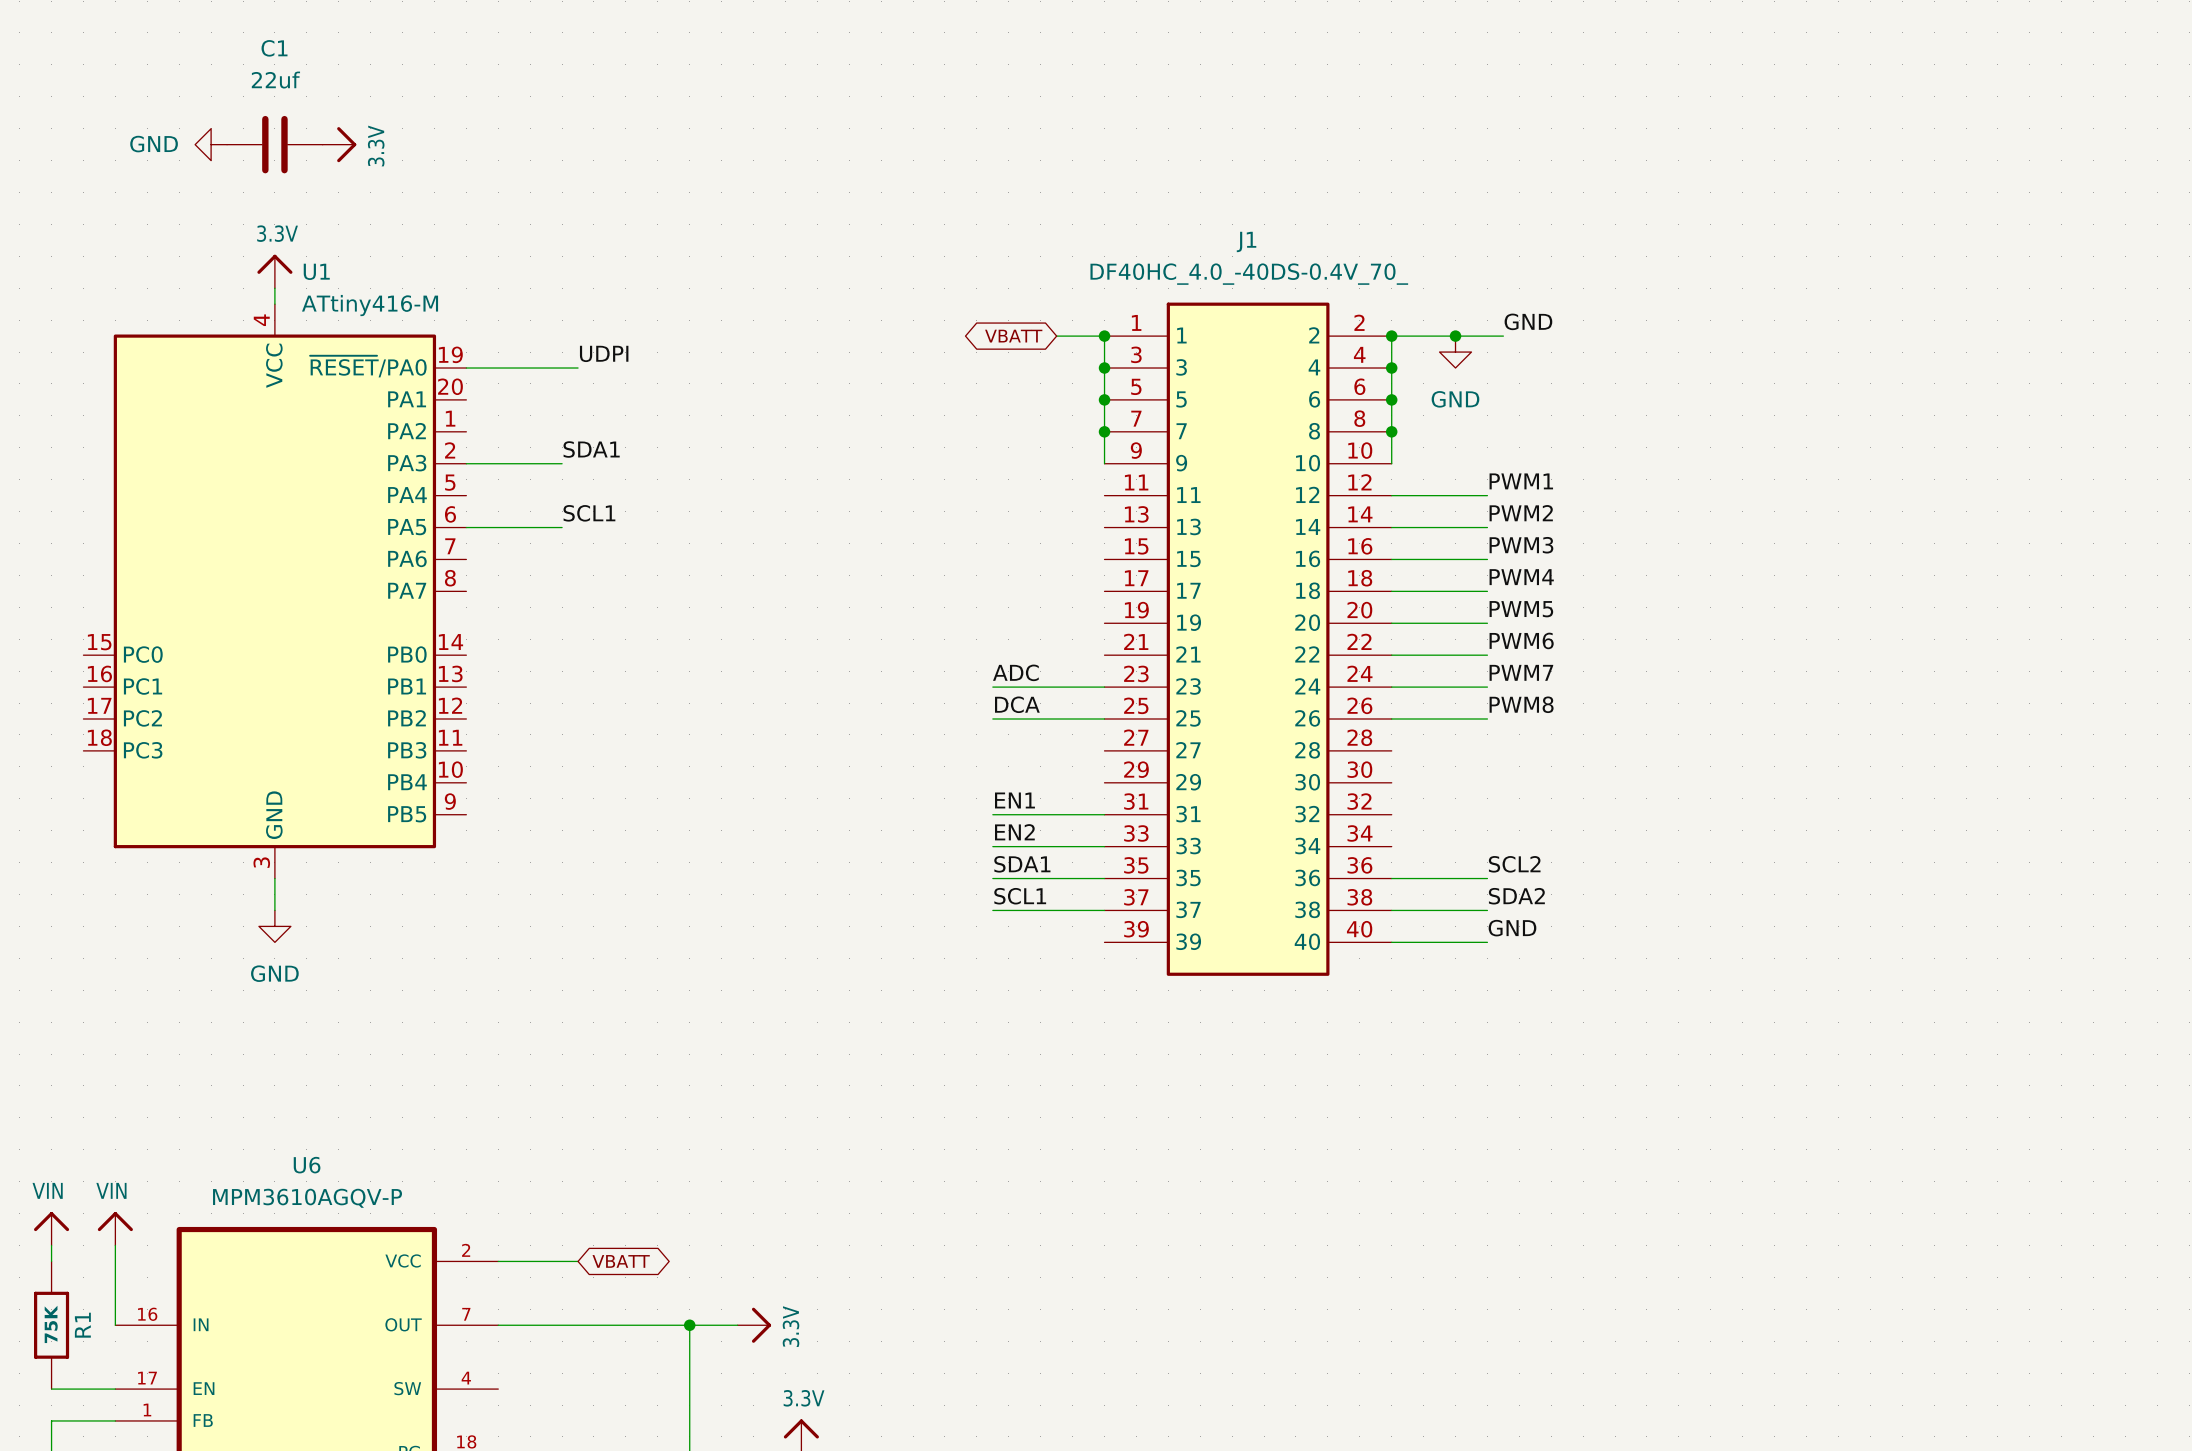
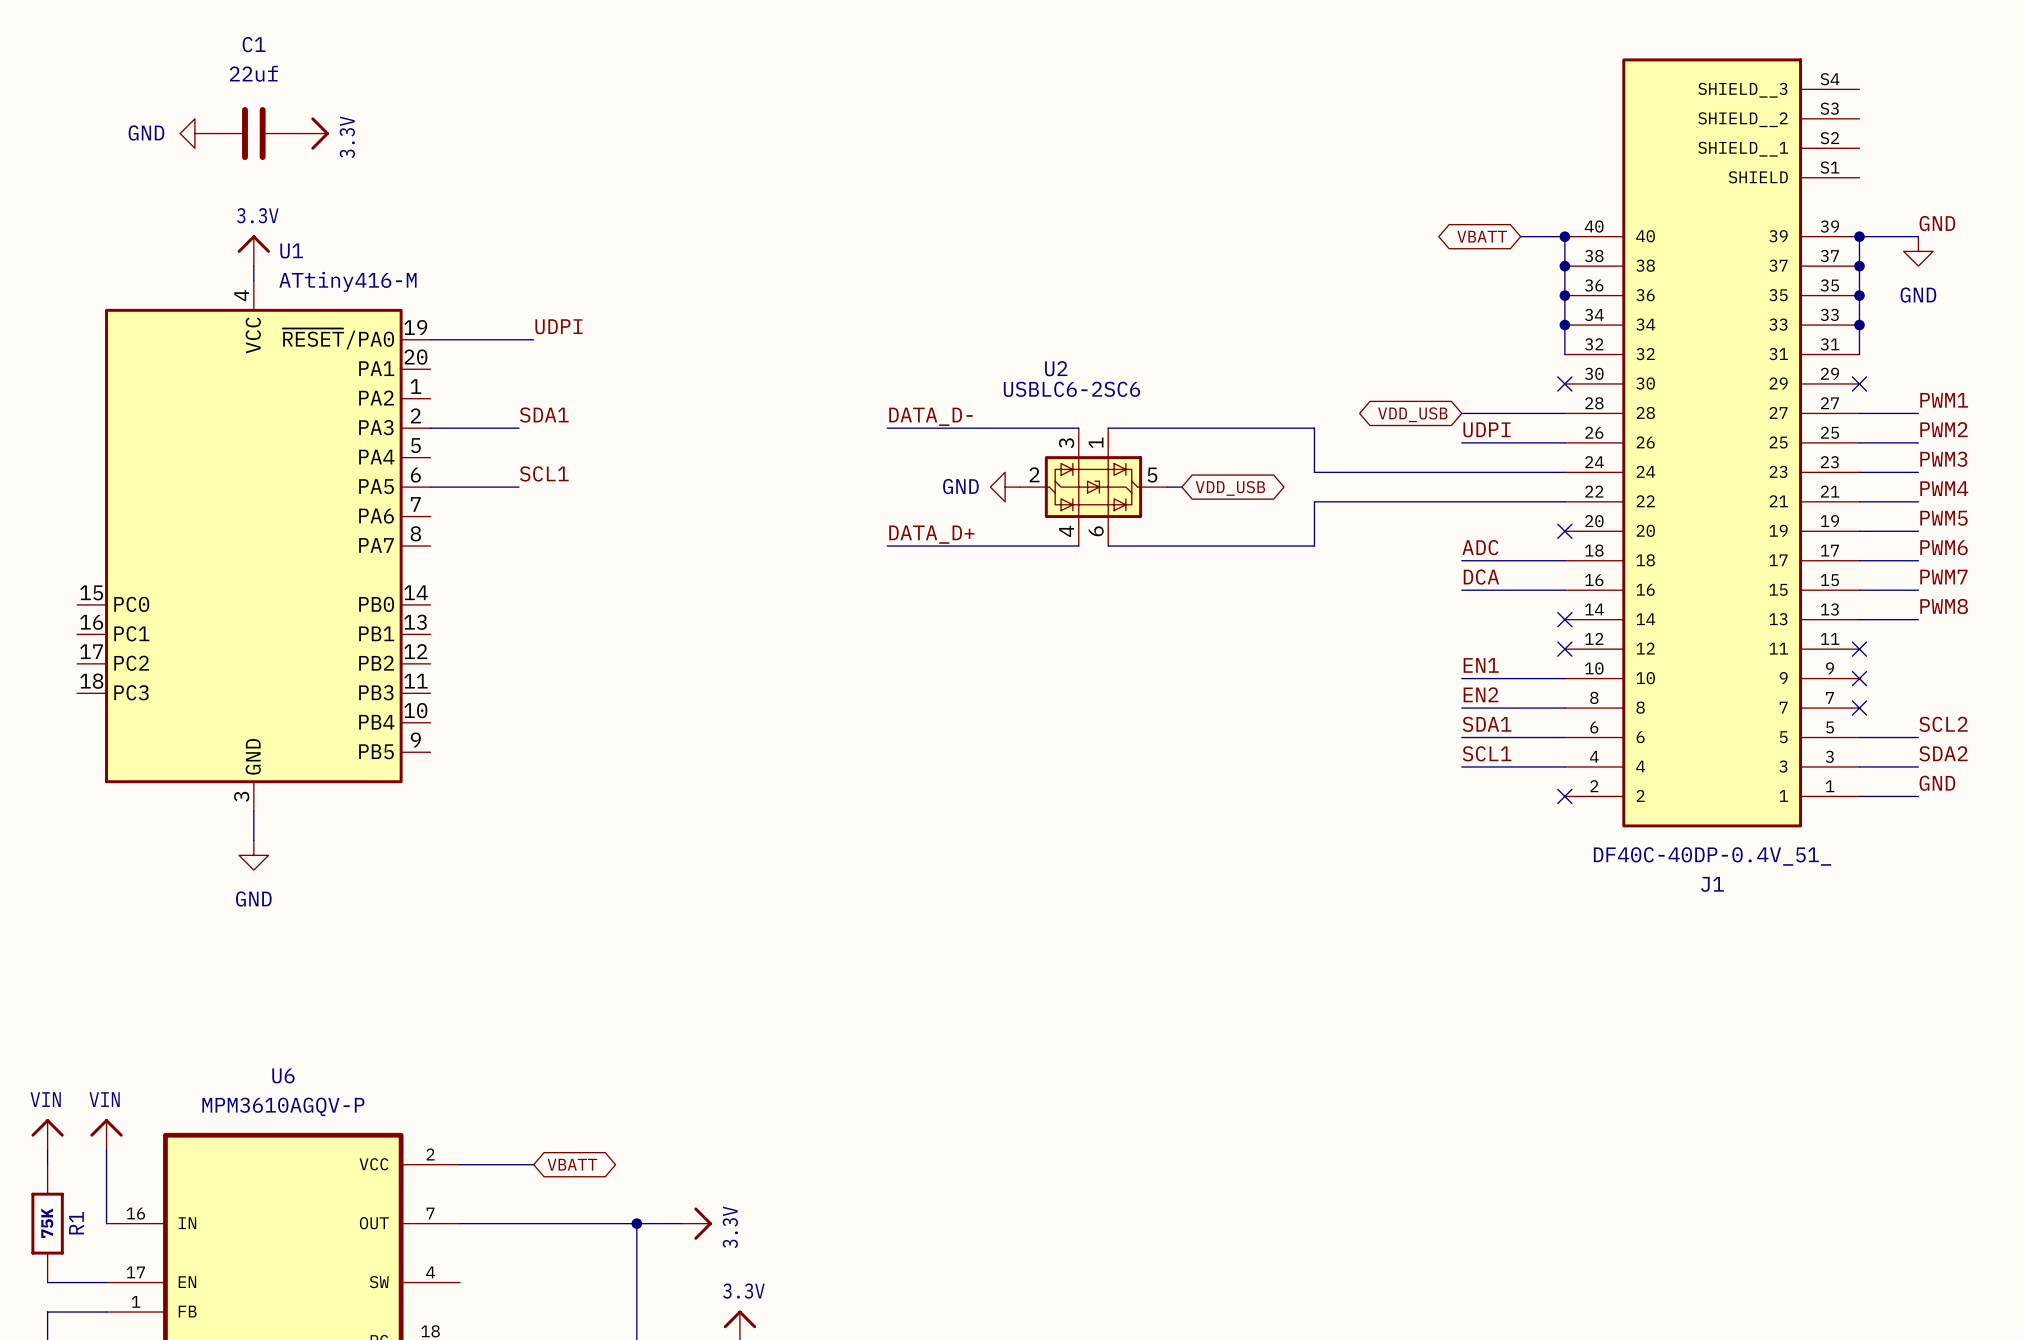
J1 name position: J1 (1246, 241) -> J1 (1712, 884)
label: none -> GND (1937, 223)
global label: none -> VBATT (1482, 236)
wire: none -> (1520, 236) (1564, 236) (1564, 354)
junction: none -> (1564, 236)
junction: none -> (1859, 236)
wire: none -> (1918, 236) (1859, 236) (1859, 354)
power symbol: none -> GND (1918, 251)
J1 value: DF40HC_4.0_-40DS-0.4V_70_ (1249, 274) -> DF40C-40DP-0.4V_51_ (1712, 856)
junction: none -> (1564, 266)
junction: none -> (1859, 266)
J1 symbol: [1104, 302, 1392, 976] -> [1564, 58, 1860, 828]
junction: none -> (1564, 295)
junction: none -> (1859, 295)
label: GND (1528, 321) -> none
global label: VBATT (1013, 336) -> none
wire: (1056, 336) (1104, 336) (1104, 463) -> none
junction: (1104, 336) -> none
junction: (1391, 336) -> none
junction: (1455, 336) -> none
wire: (1503, 336) (1391, 336) (1391, 463) -> none
power symbol: GND (1455, 352) -> none
junction: none -> (1564, 325)
junction: none -> (1859, 325)
junction: (1104, 368) -> none
junction: (1391, 368) -> none
junction: (1104, 399) -> none
junction: (1391, 399) -> none
no-connect mark: none -> (1564, 383)
no-connect mark: none -> (1859, 383)
junction: (1104, 431) -> none
junction: (1391, 431) -> none
label: none -> PWM1 (1944, 400)
wire: none -> (1461, 413) (1564, 413)
wire: none -> (1859, 413) (1918, 413)
global label: none -> VDD_USB (1412, 414)
label: none -> DATA_D- (930, 416)
wire: none -> (887, 428) (1078, 428)
wire: none -> (1108, 428) (1314, 428) (1314, 472) (1564, 472)
label: none -> UDPI (1487, 429)
label: none -> PWM2 (1944, 429)
wire: none -> (1461, 442) (1564, 442)
wire: none -> (1859, 442) (1918, 442)
label: PWM1 (1521, 481) -> none
wire: (1391, 495) (1487, 495) -> none
label: none -> PWM3 (1943, 459)
wire: none -> (1859, 472) (1918, 472)
label: PWM2 (1521, 513) -> none
power symbol: none -> GND (1005, 487)
U2: none -> USBLC6-2SC6 (1093, 487)
wire: (1391, 527) (1487, 527) -> none
global label: none -> VDD_USB (1230, 488)
label: none -> PWM4 (1944, 488)
wire: none -> (1859, 501) (1918, 501)
label: PWM3 (1521, 545) -> none
wire: (1391, 559) (1487, 559) -> none
label: none -> PWM5 (1943, 518)
no-connect mark: none -> (1564, 531)
wire: none -> (1859, 531) (1918, 531)
label: PWM4 (1521, 577) -> none
label: none -> DATA_D+ (931, 534)
wire: none -> (887, 546) (1078, 546)
wire: (1423, 591) (1487, 591) -> (1314, 546) (1314, 501) (1564, 501)
label: none -> ADC (1480, 547)
label: none -> PWM6 (1944, 547)
wire: none -> (1461, 560) (1564, 560)
wire: none -> (1859, 560) (1918, 560)
label: PWM5 (1521, 609) -> none
wire: (1391, 623) (1487, 623) -> none
label: none -> PWM7 (1943, 577)
label: none -> DCA (1481, 577)
wire: none -> (1461, 590) (1564, 590)
wire: none -> (1859, 590) (1918, 590)
label: PWM6 (1521, 640) -> none
wire: (1391, 655) (1487, 655) -> none
label: none -> PWM8 (1944, 606)
no-connect mark: none -> (1564, 619)
wire: none -> (1859, 619) (1918, 619)
label: ADC (1015, 672) -> none
label: PWM7 (1521, 672) -> none
wire: (992, 687) (1104, 687) -> none
wire: (1391, 687) (1487, 687) -> none
no-connect mark: none -> (1564, 649)
no-connect mark: none -> (1859, 649)
label: DCA (1017, 704) -> none
label: PWM8 (1521, 704) -> none
wire: (992, 718) (1104, 718) -> none
wire: (1391, 718) (1487, 718) -> none
label: none -> EN1 (1481, 665)
wire: none -> (1461, 678) (1564, 678)
no-connect mark: none -> (1859, 678)
label: none -> EN2 (1481, 694)
wire: none -> (1461, 708) (1564, 708)
no-connect mark: none -> (1859, 708)
label: none -> SDA1 (1487, 724)
label: none -> SCL2 (1943, 724)
wire: none -> (1461, 737) (1564, 737)
wire: none -> (1859, 737) (1918, 737)
label: EN1 (1014, 800) -> none
wire: (992, 814) (1104, 814) -> none
label: none -> SCL1 (1487, 753)
label: none -> SDA2 (1943, 753)
wire: none -> (1461, 766) (1564, 766)
wire: none -> (1859, 766) (1918, 766)
label: EN2 (1014, 832) -> none
wire: (992, 846) (1104, 846) -> none
label: none -> GND (1937, 783)
no-connect mark: none -> (1564, 796)
wire: none -> (1859, 796) (1918, 796)
label: SDA1 (1022, 864) -> none
label: SCL2 (1514, 864) -> none
wire: (992, 878) (1104, 878) -> none
wire: (1391, 878) (1487, 878) -> none
label: SCL1 (1020, 896) -> none
label: SDA2 (1516, 896) -> none
wire: (992, 910) (1104, 910) -> none
wire: (1391, 910) (1487, 910) -> none
label: GND (1512, 928) -> none
wire: (1391, 942) (1487, 942) -> none

